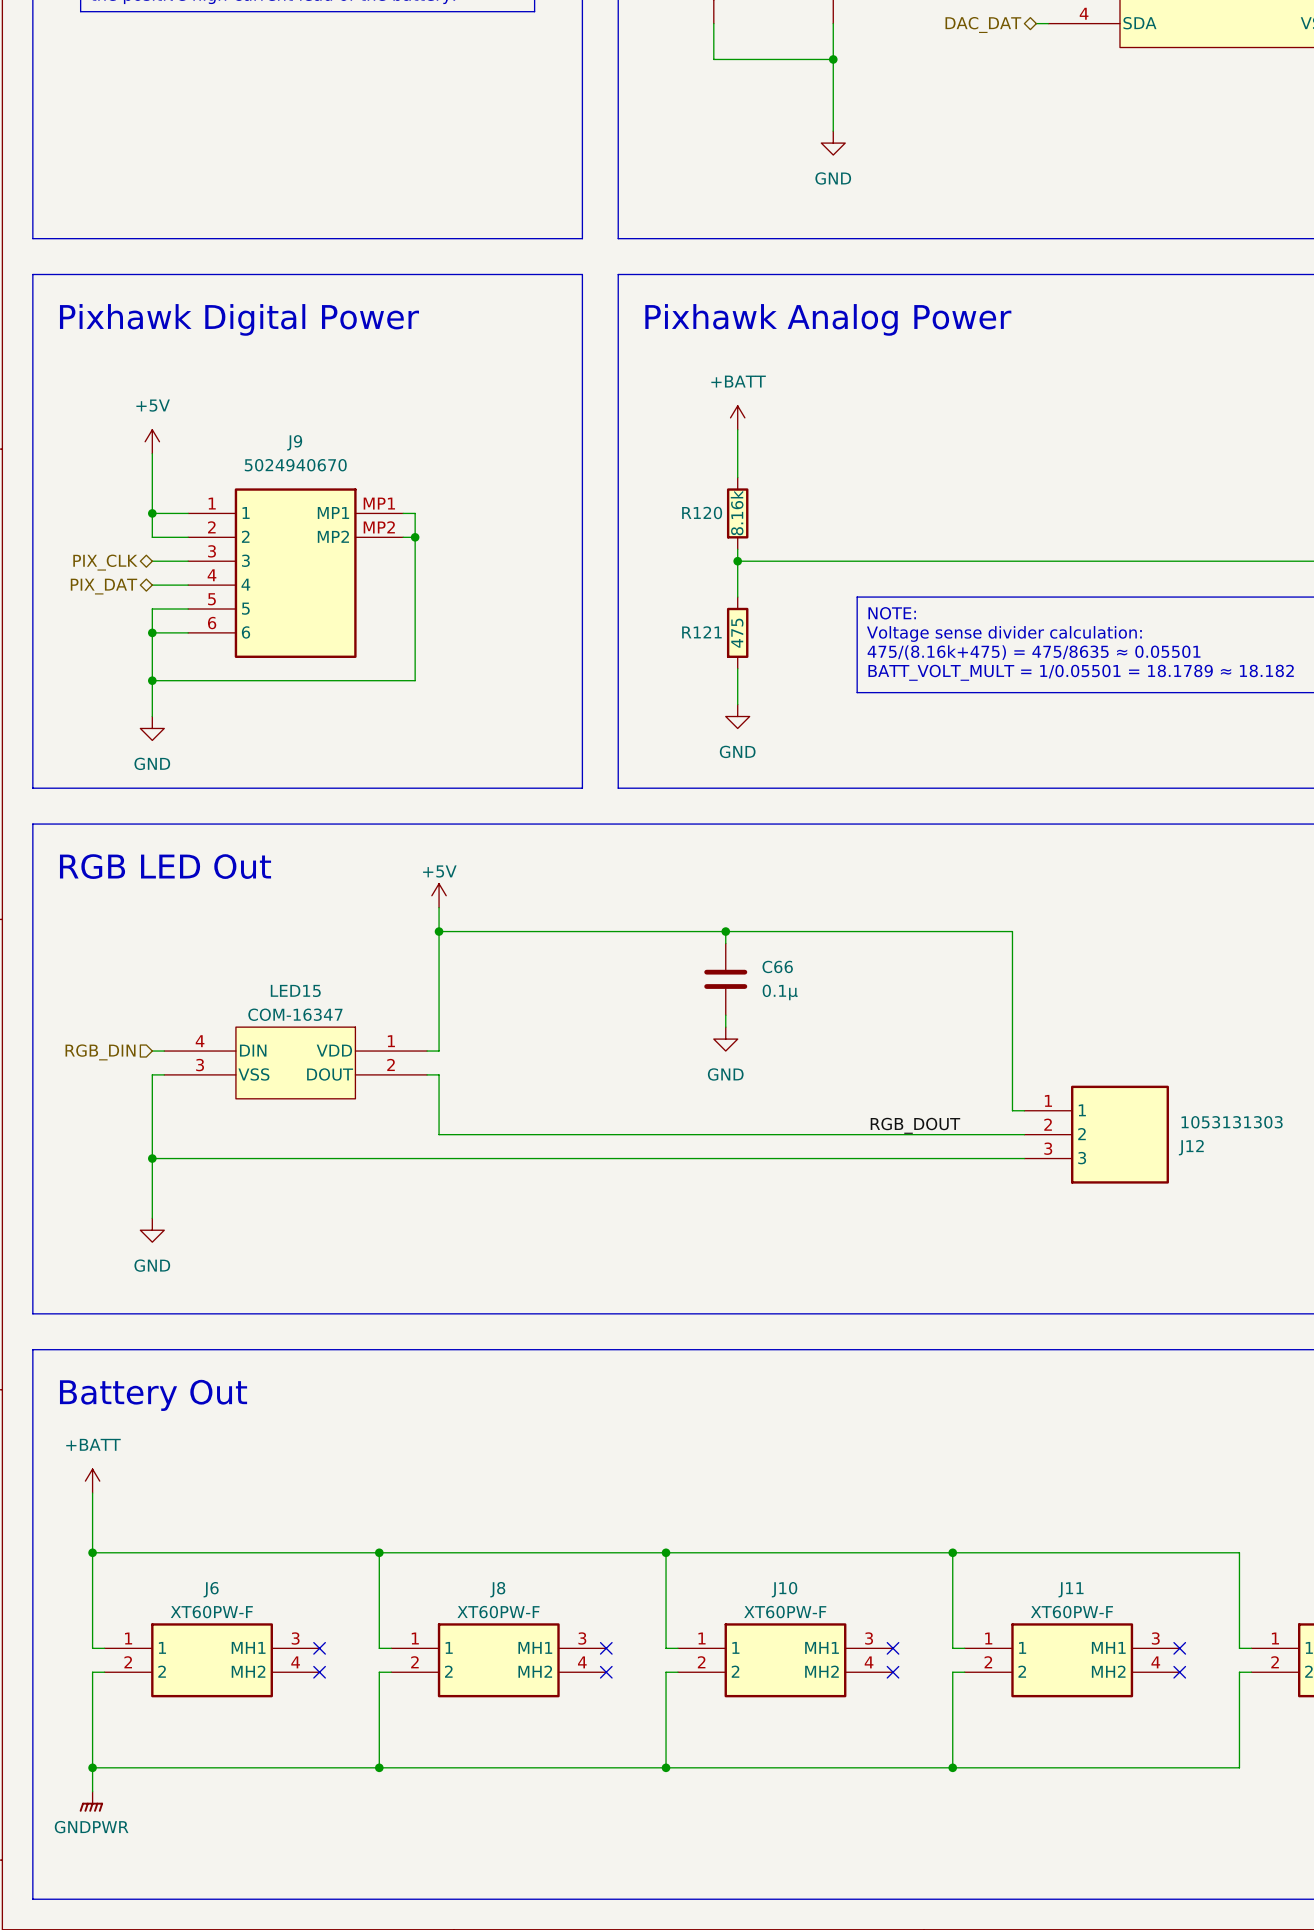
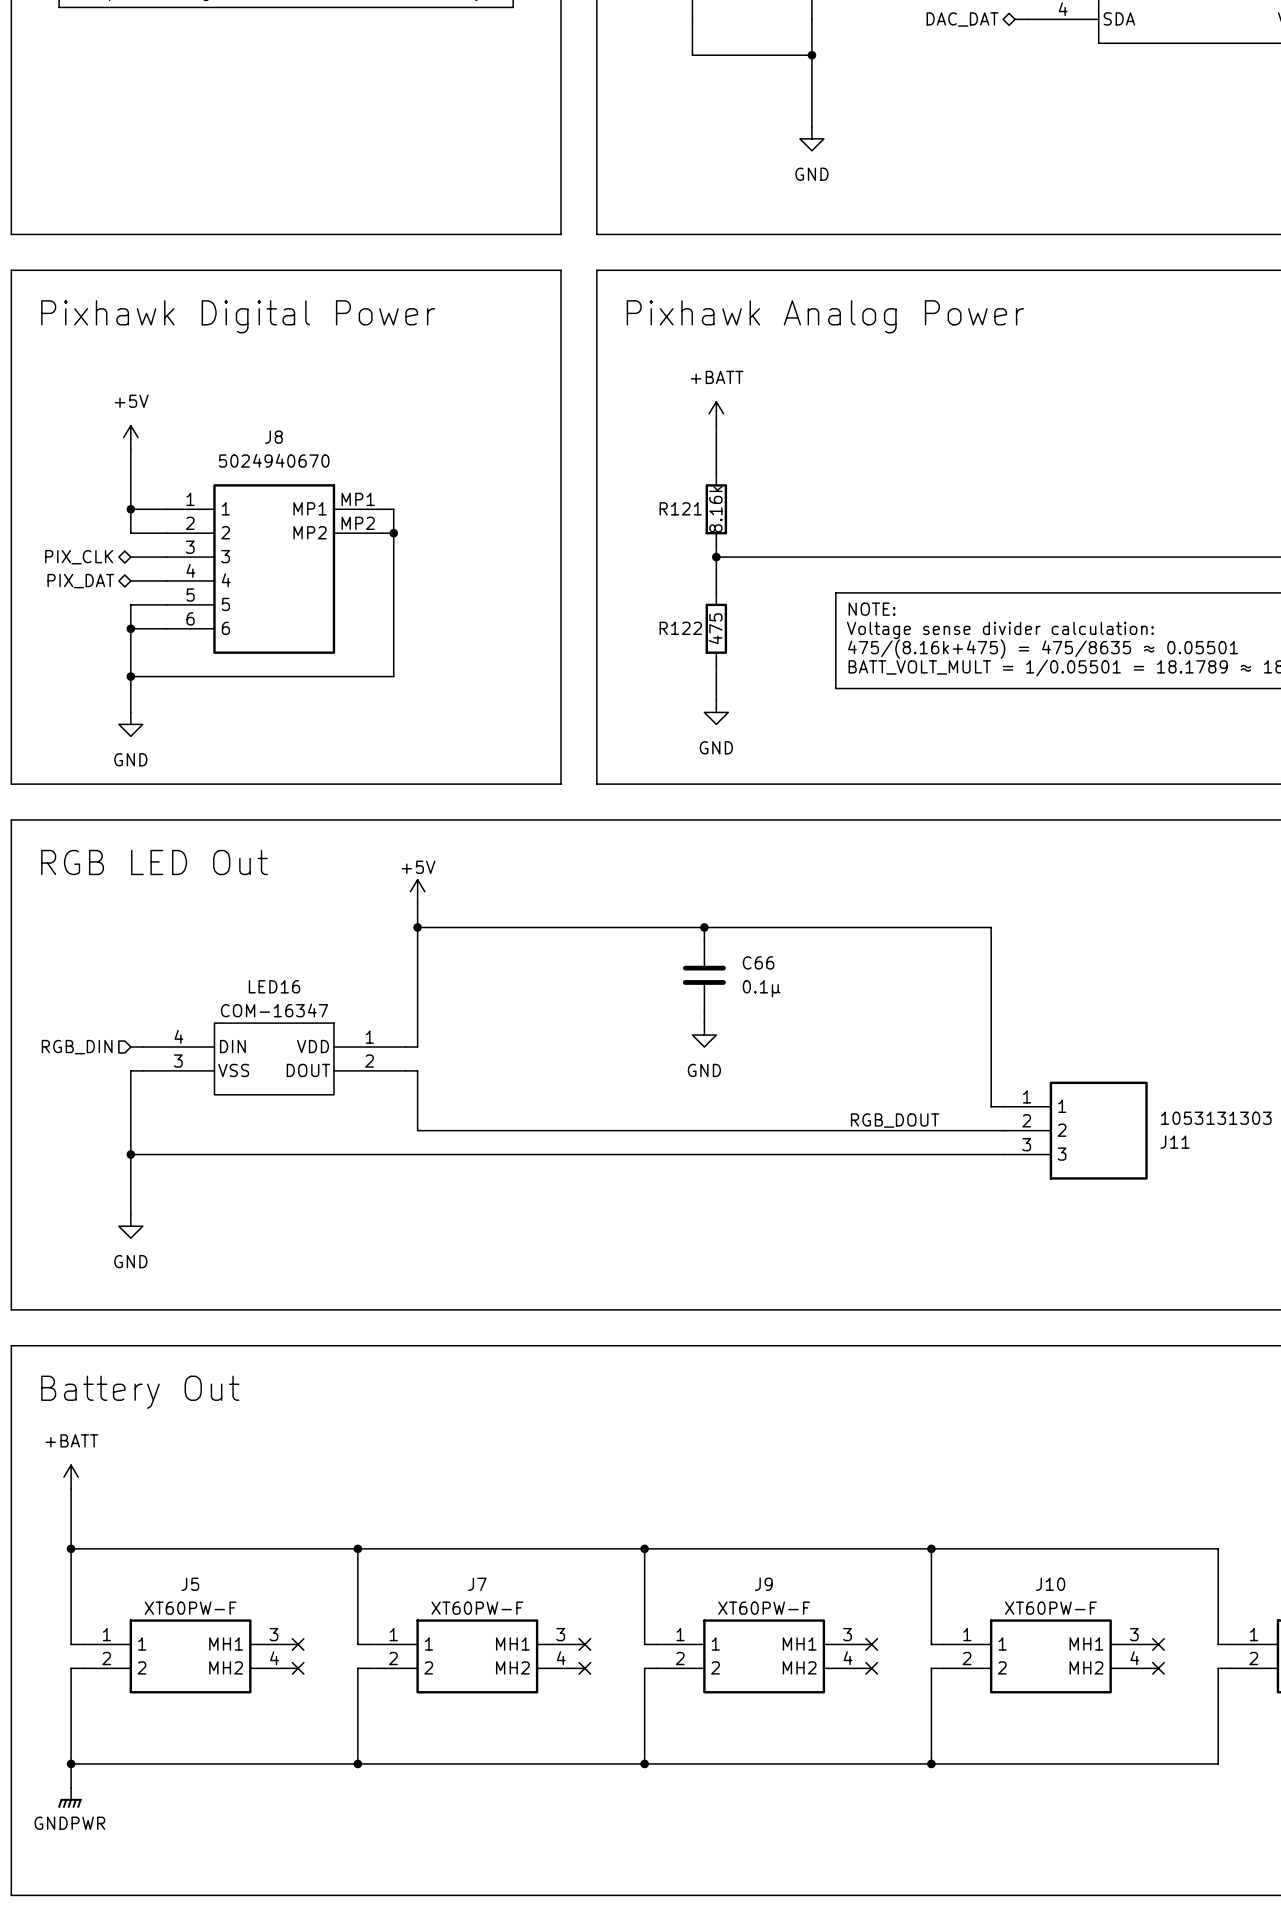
J9 name: J9 (294, 442) -> J8 (273, 437)
R120 name: R120 (702, 512) -> R121 (680, 508)
R121 name: R121 (701, 632) -> R122 (680, 628)
LED15 name: LED15 (295, 990) -> LED16 (274, 986)
J12 name: J12 (1191, 1147) -> J11 (1175, 1142)
J6 name: J6 (211, 1589) -> J5 (190, 1584)
J8 name: J8 (497, 1589) -> J7 (477, 1584)
J10 name: J10 (784, 1589) -> J9 (763, 1584)
J11 name: J11 (1071, 1589) -> J10 (1050, 1584)

